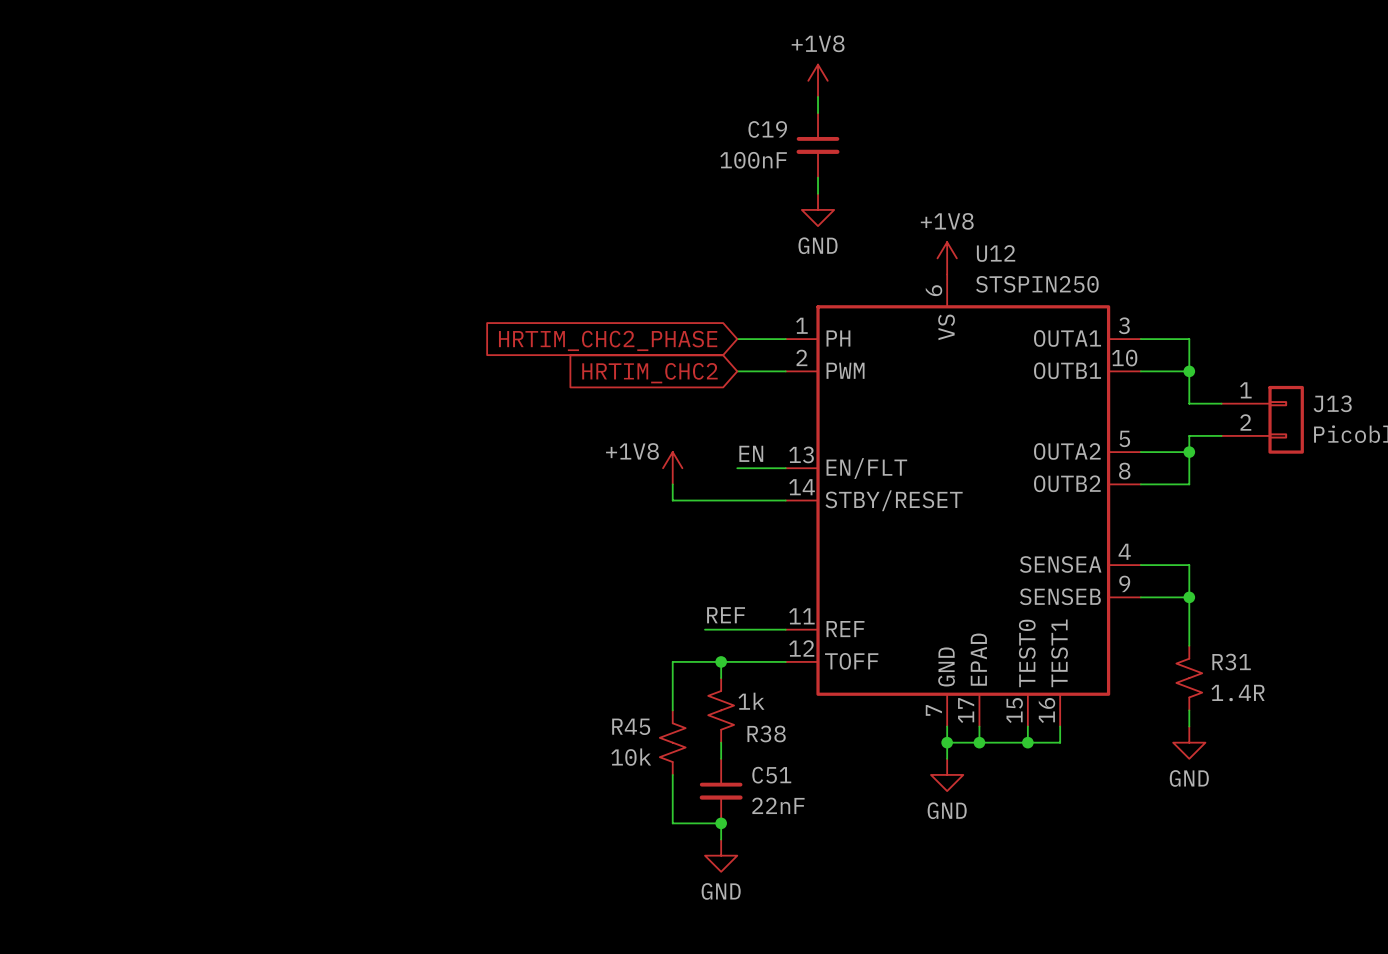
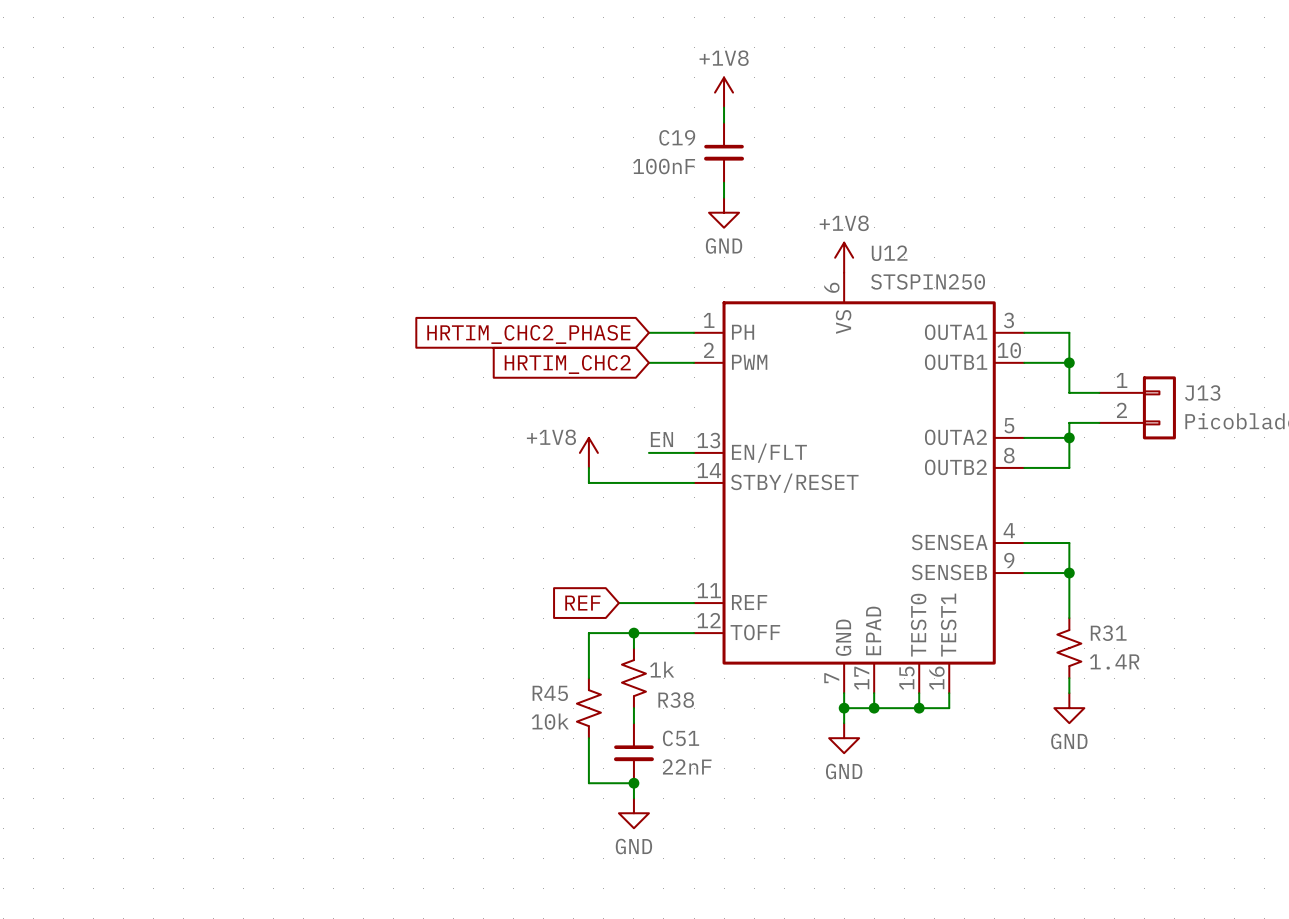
label: REF (726, 615) -> none
global label: none -> REF (582, 603)

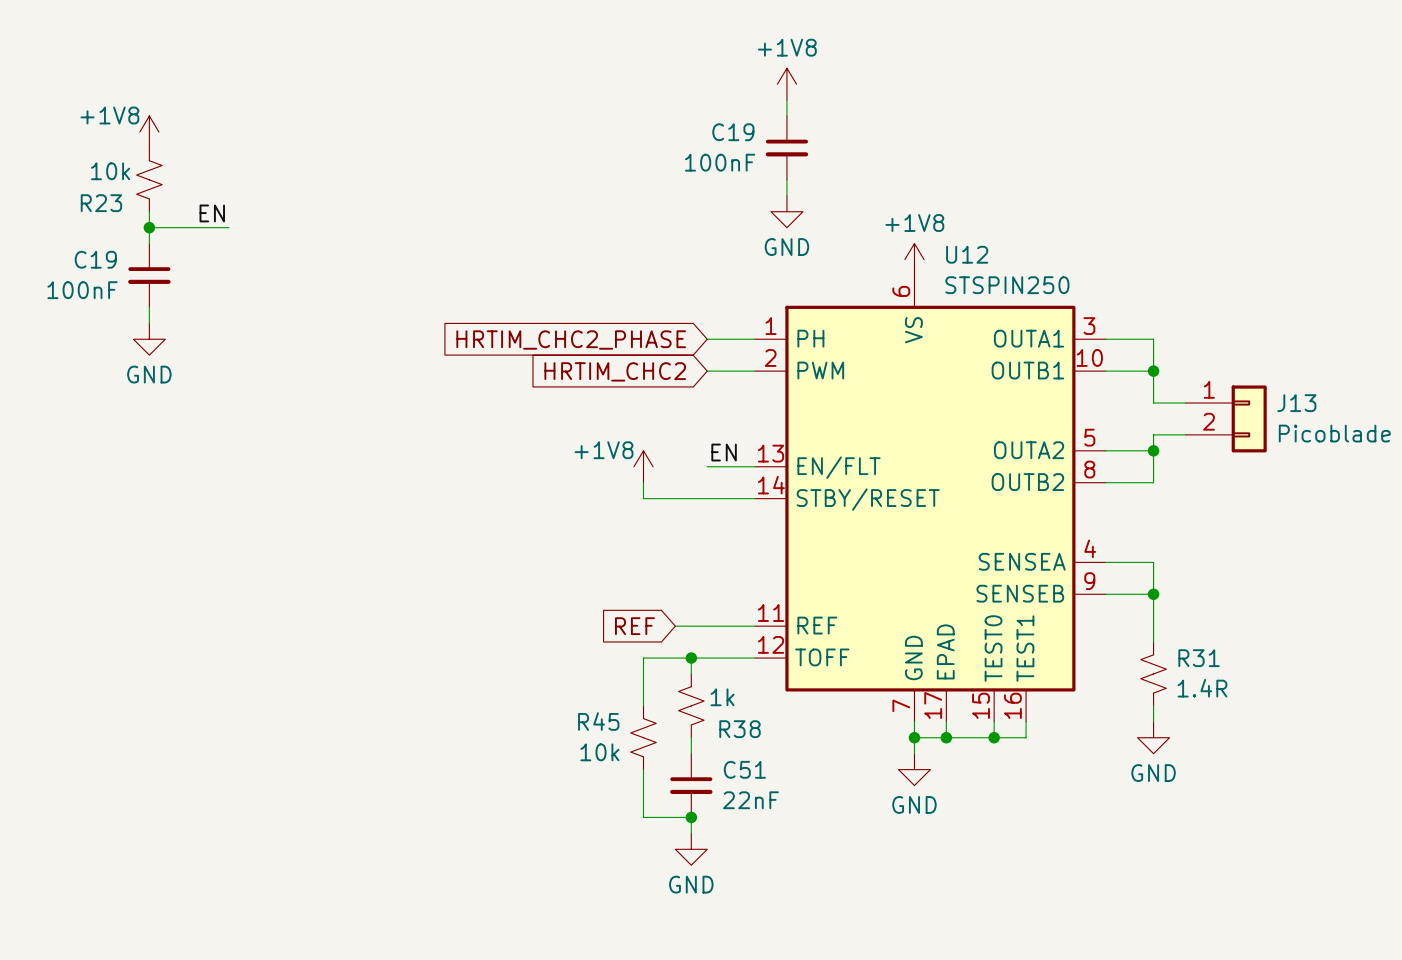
power symbol: none -> +1V8 (149, 132)
R23: none -> 10k (149, 179)
wire: none -> (149, 211) (149, 243)
label: none -> EN (212, 213)
wire: none -> (149, 227) (229, 227)
junction: none -> (149, 227)
C19: none -> 100nF (149, 275)
wire: none -> (149, 307) (149, 323)
power symbol: none -> GND (149, 339)

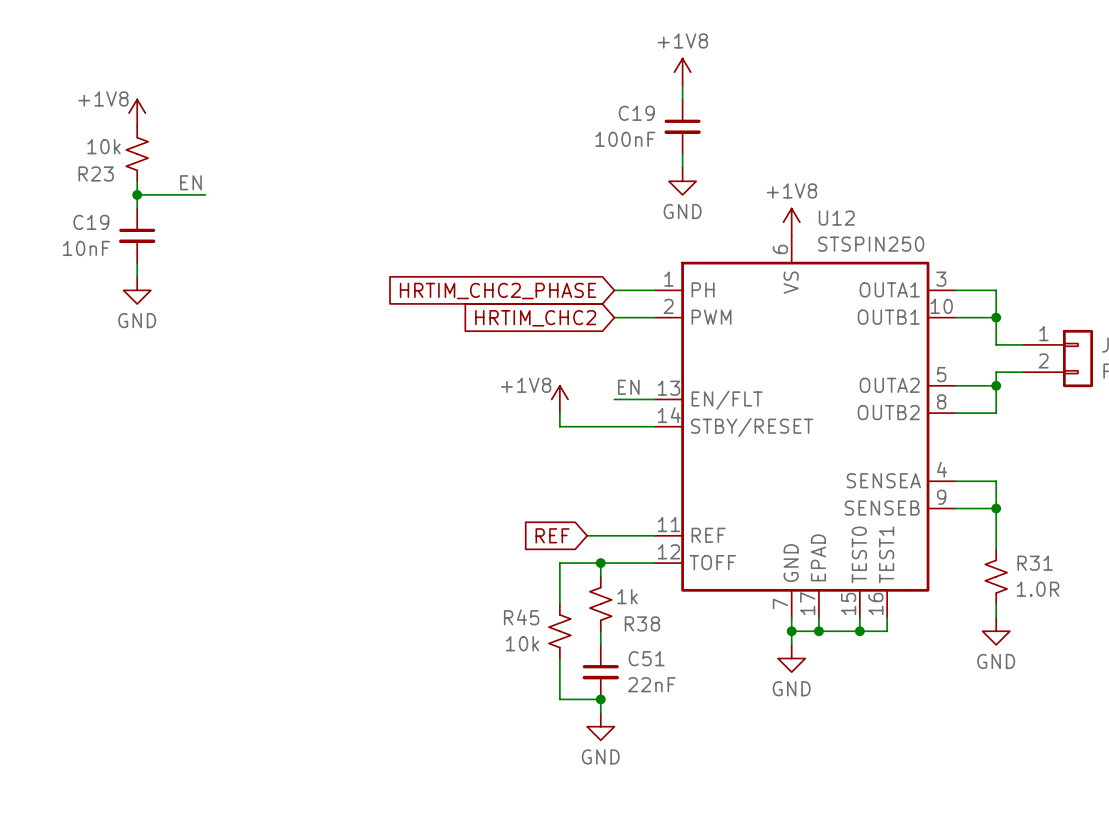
C19 value: 100nF (82, 290) -> 10nF (86, 248)
R31 value: 1.4R (1202, 688) -> 1.0R (1038, 589)

